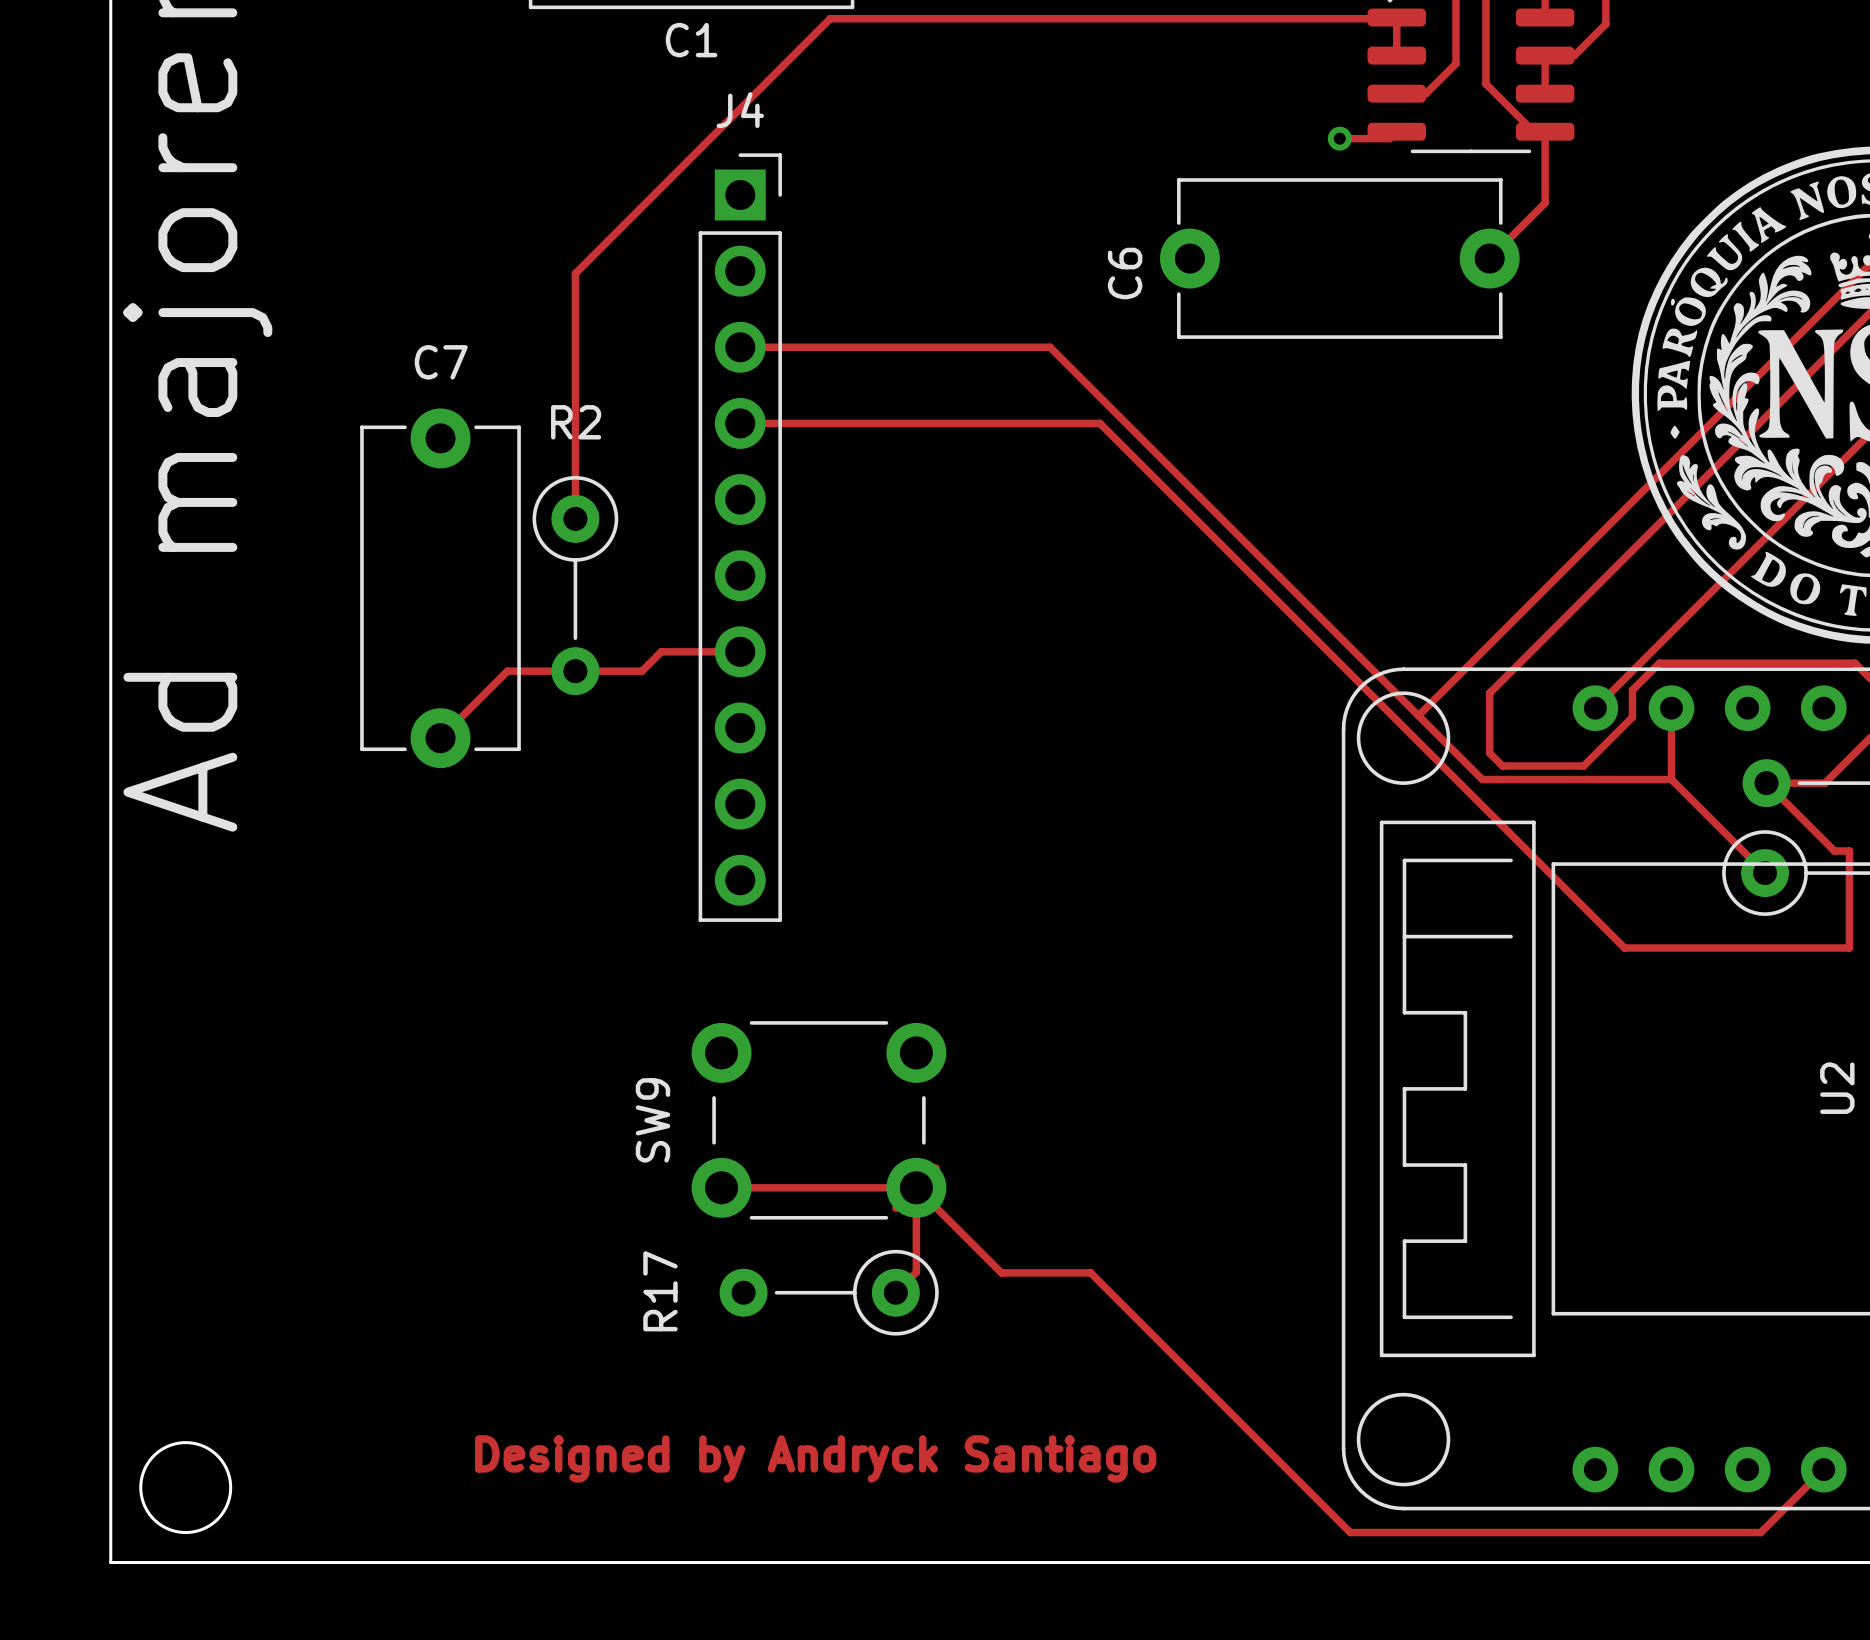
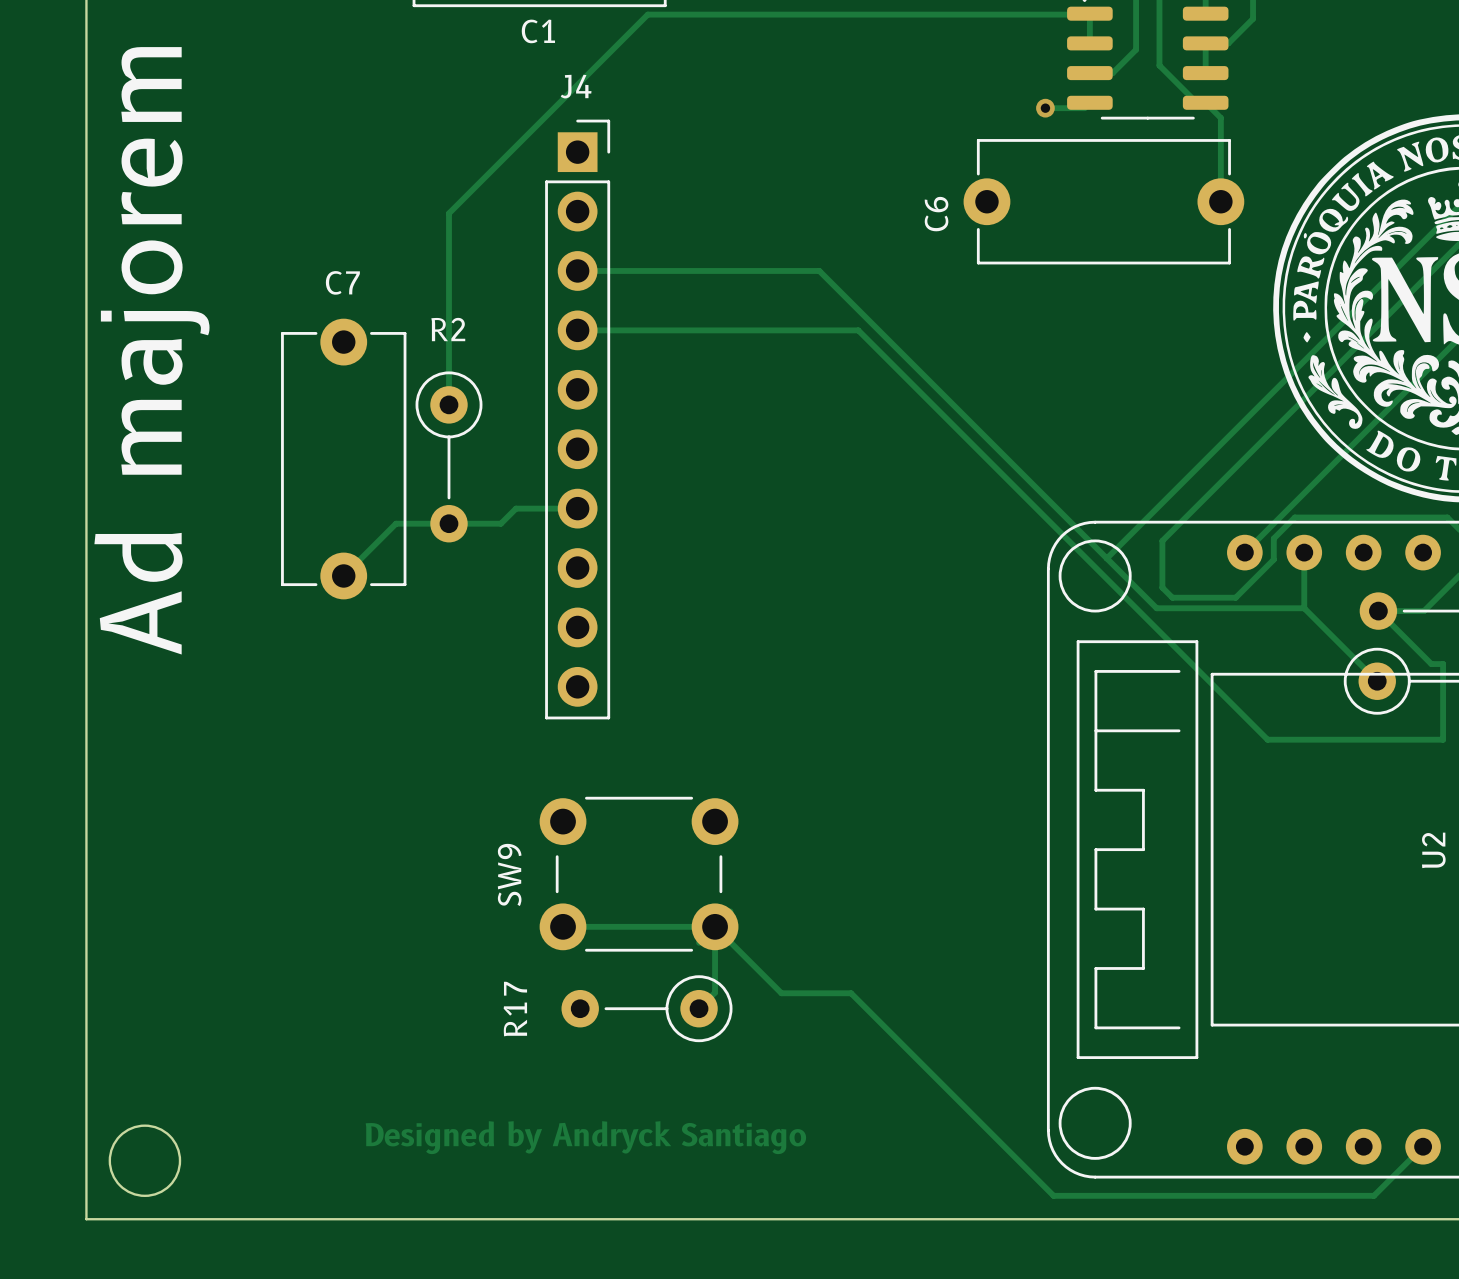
track: (1545, 131) (1545, 203) (1489, 258) -> (1205, 102) (1220, 118) (1220, 201)
C6 position: (1339, 258) -> (1103, 201)

